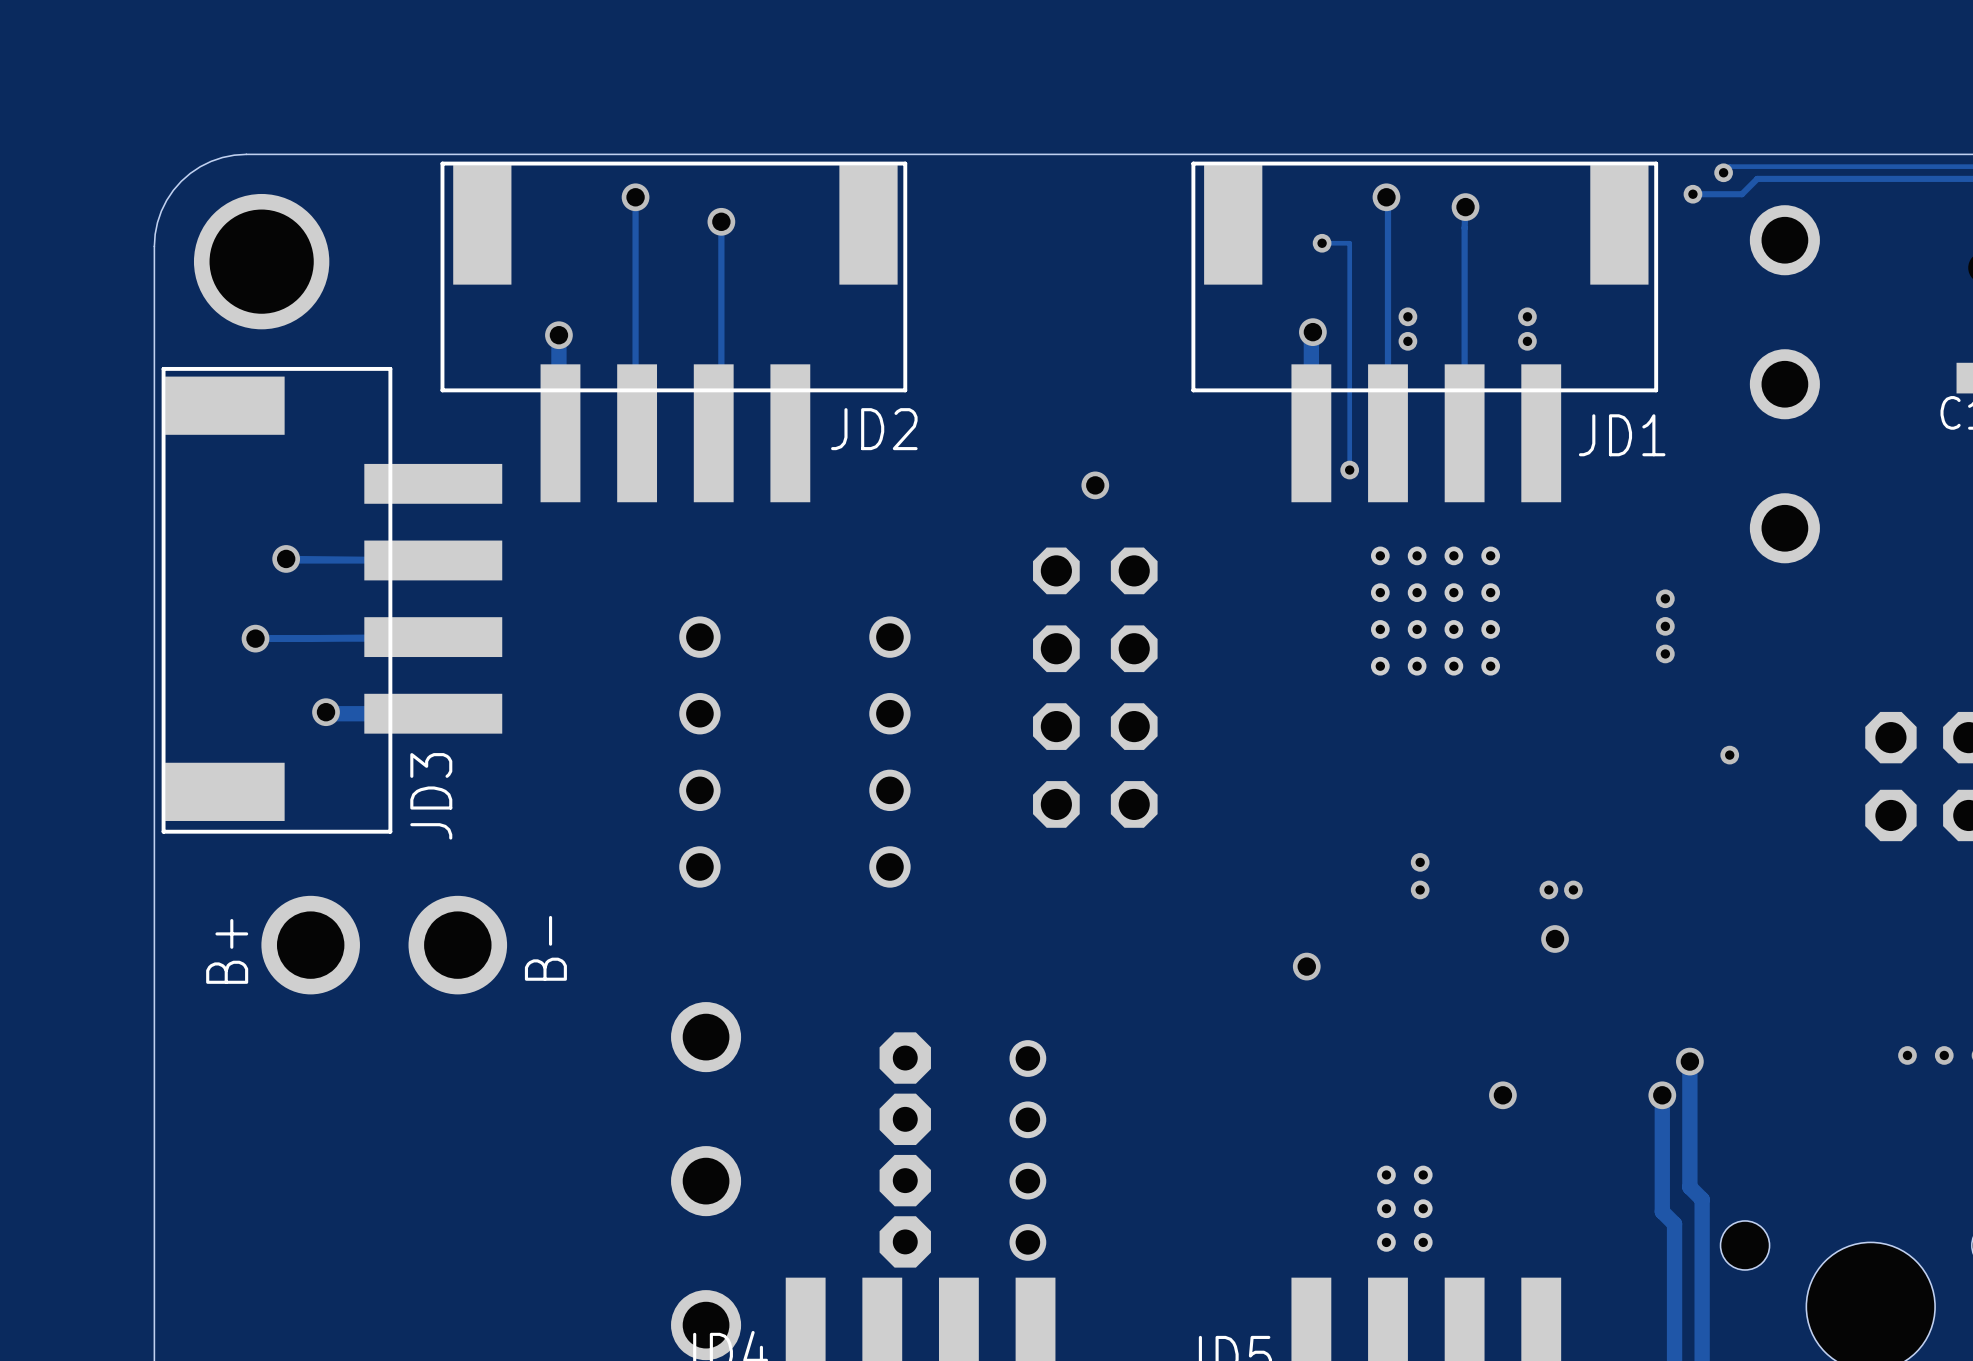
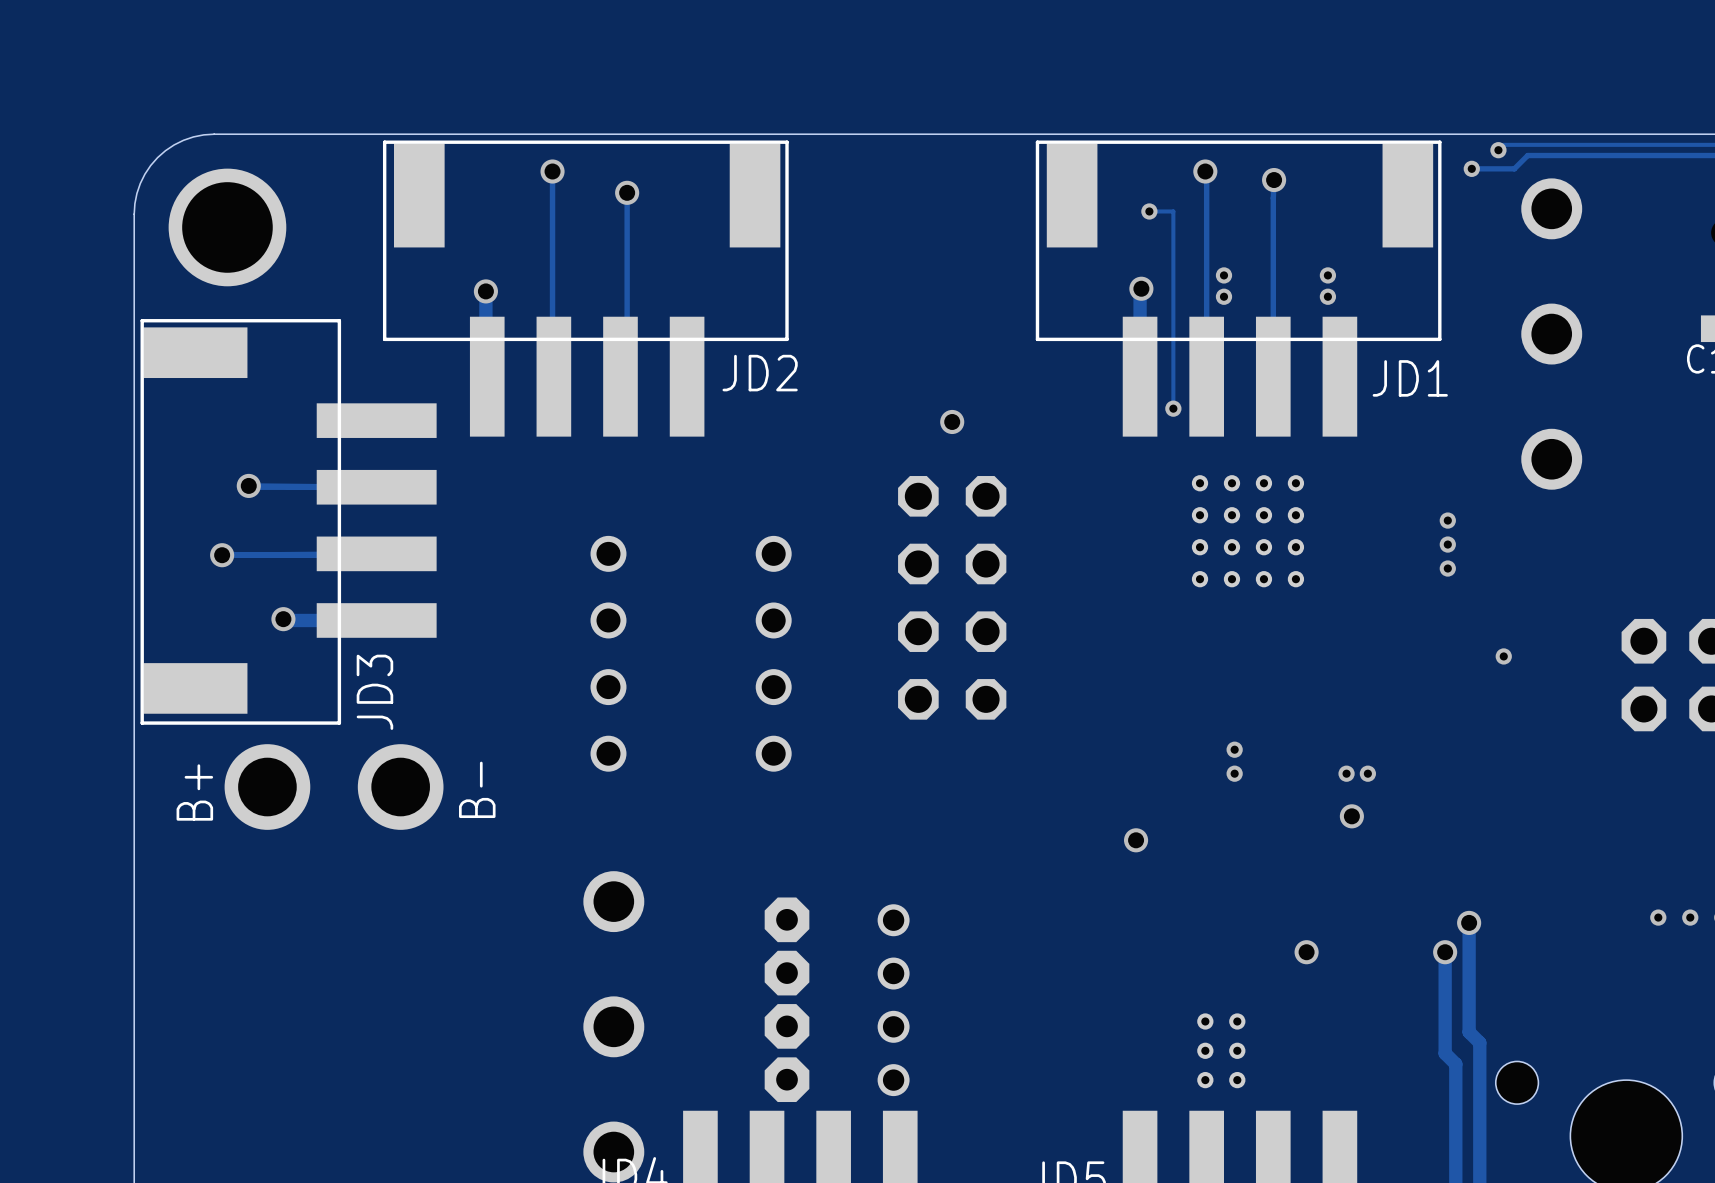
B+ position: (310, 945) -> (267, 787)
B- position: (457, 945) -> (400, 787)

